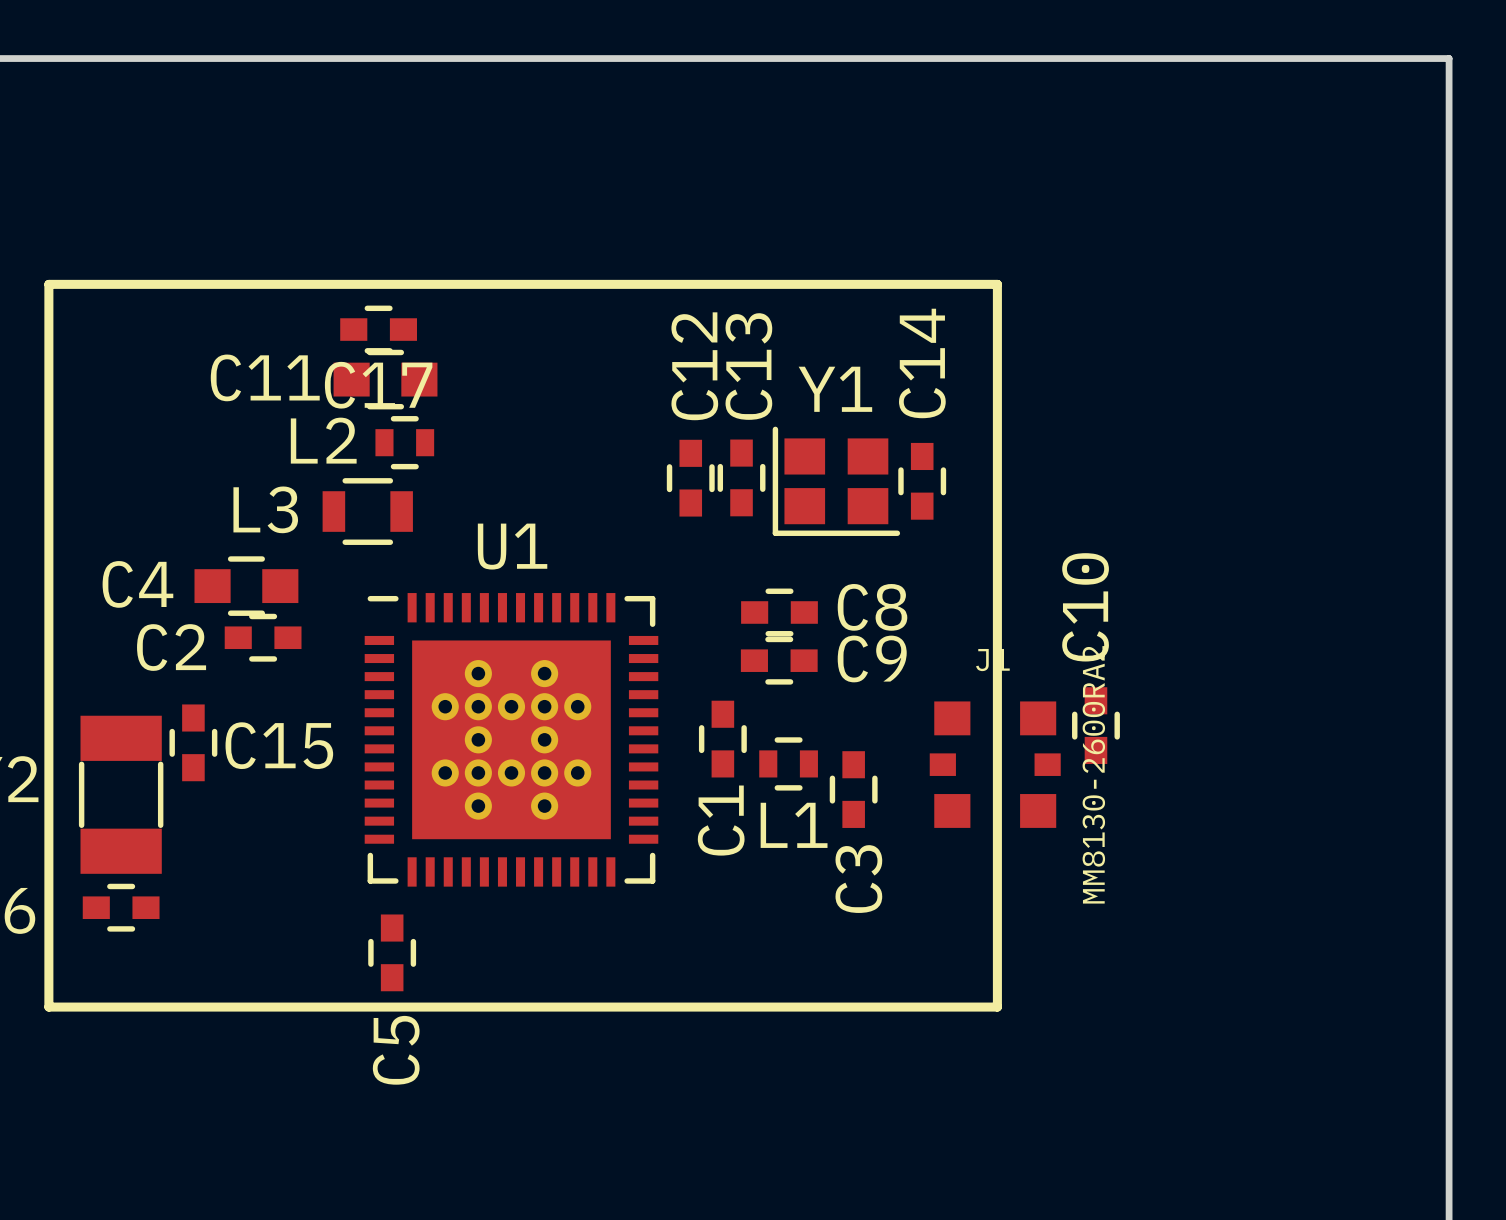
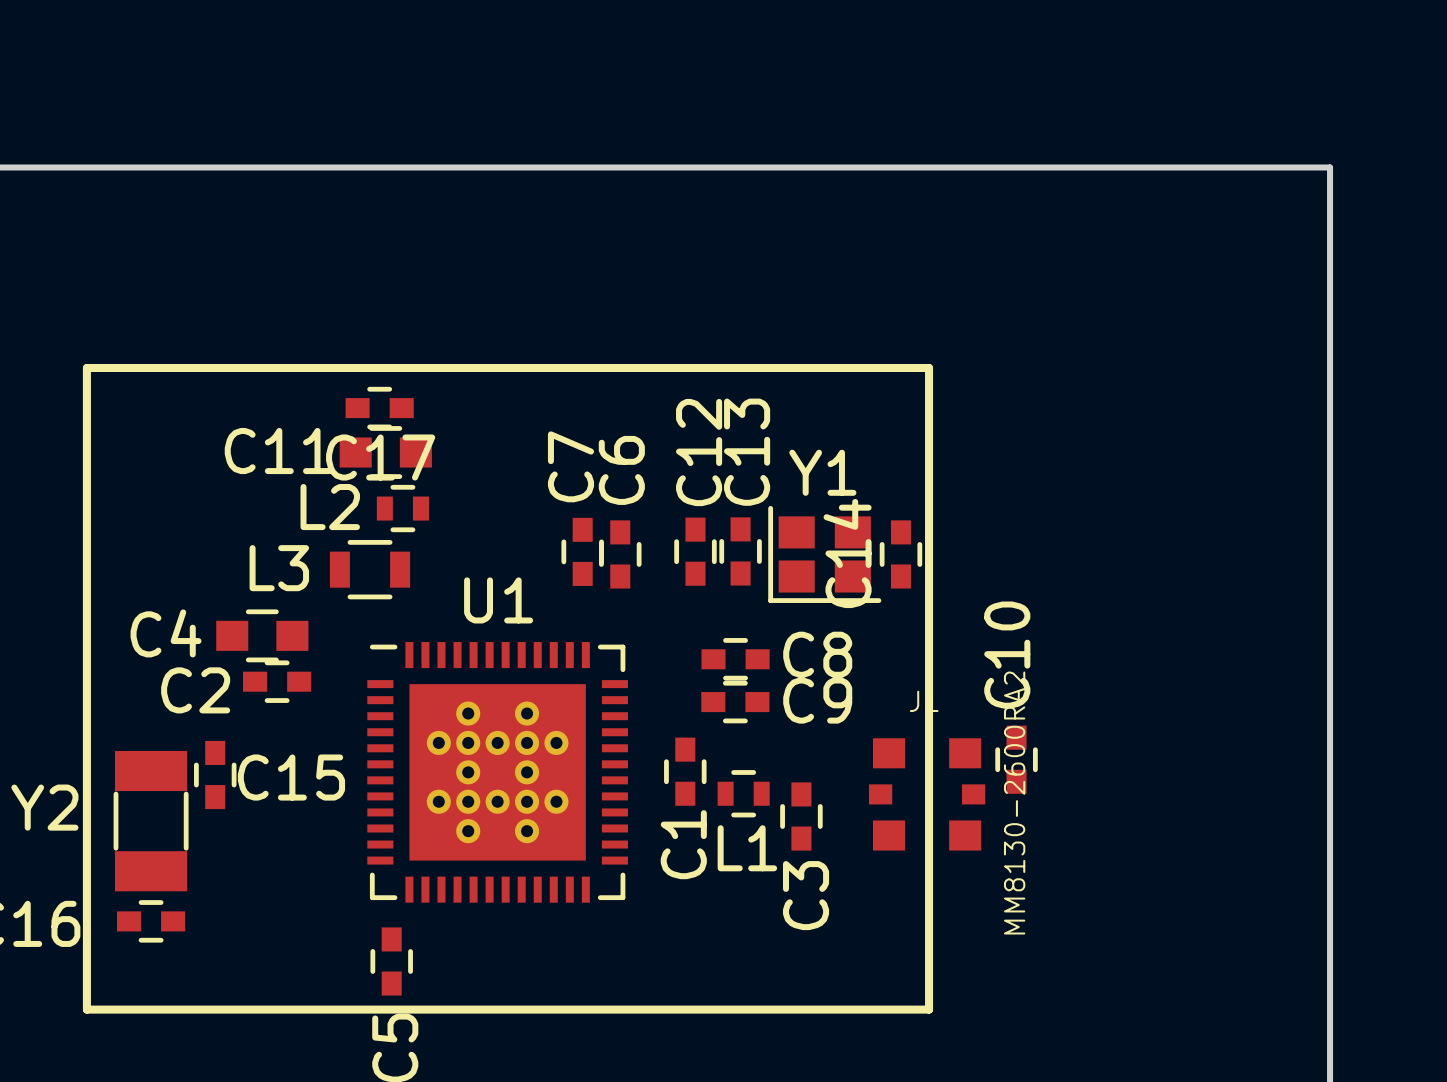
C14 name position: C14 (922, 363) -> C14 (847, 553)
C13 position: (741, 477) -> (740, 551)
C12 position: (690, 478) -> (695, 551)
Y1 position: (836, 481) -> (824, 554)
C14 position: (922, 481) -> (900, 554)
C7: none -> (582, 551)
C6: none -> (620, 554)

